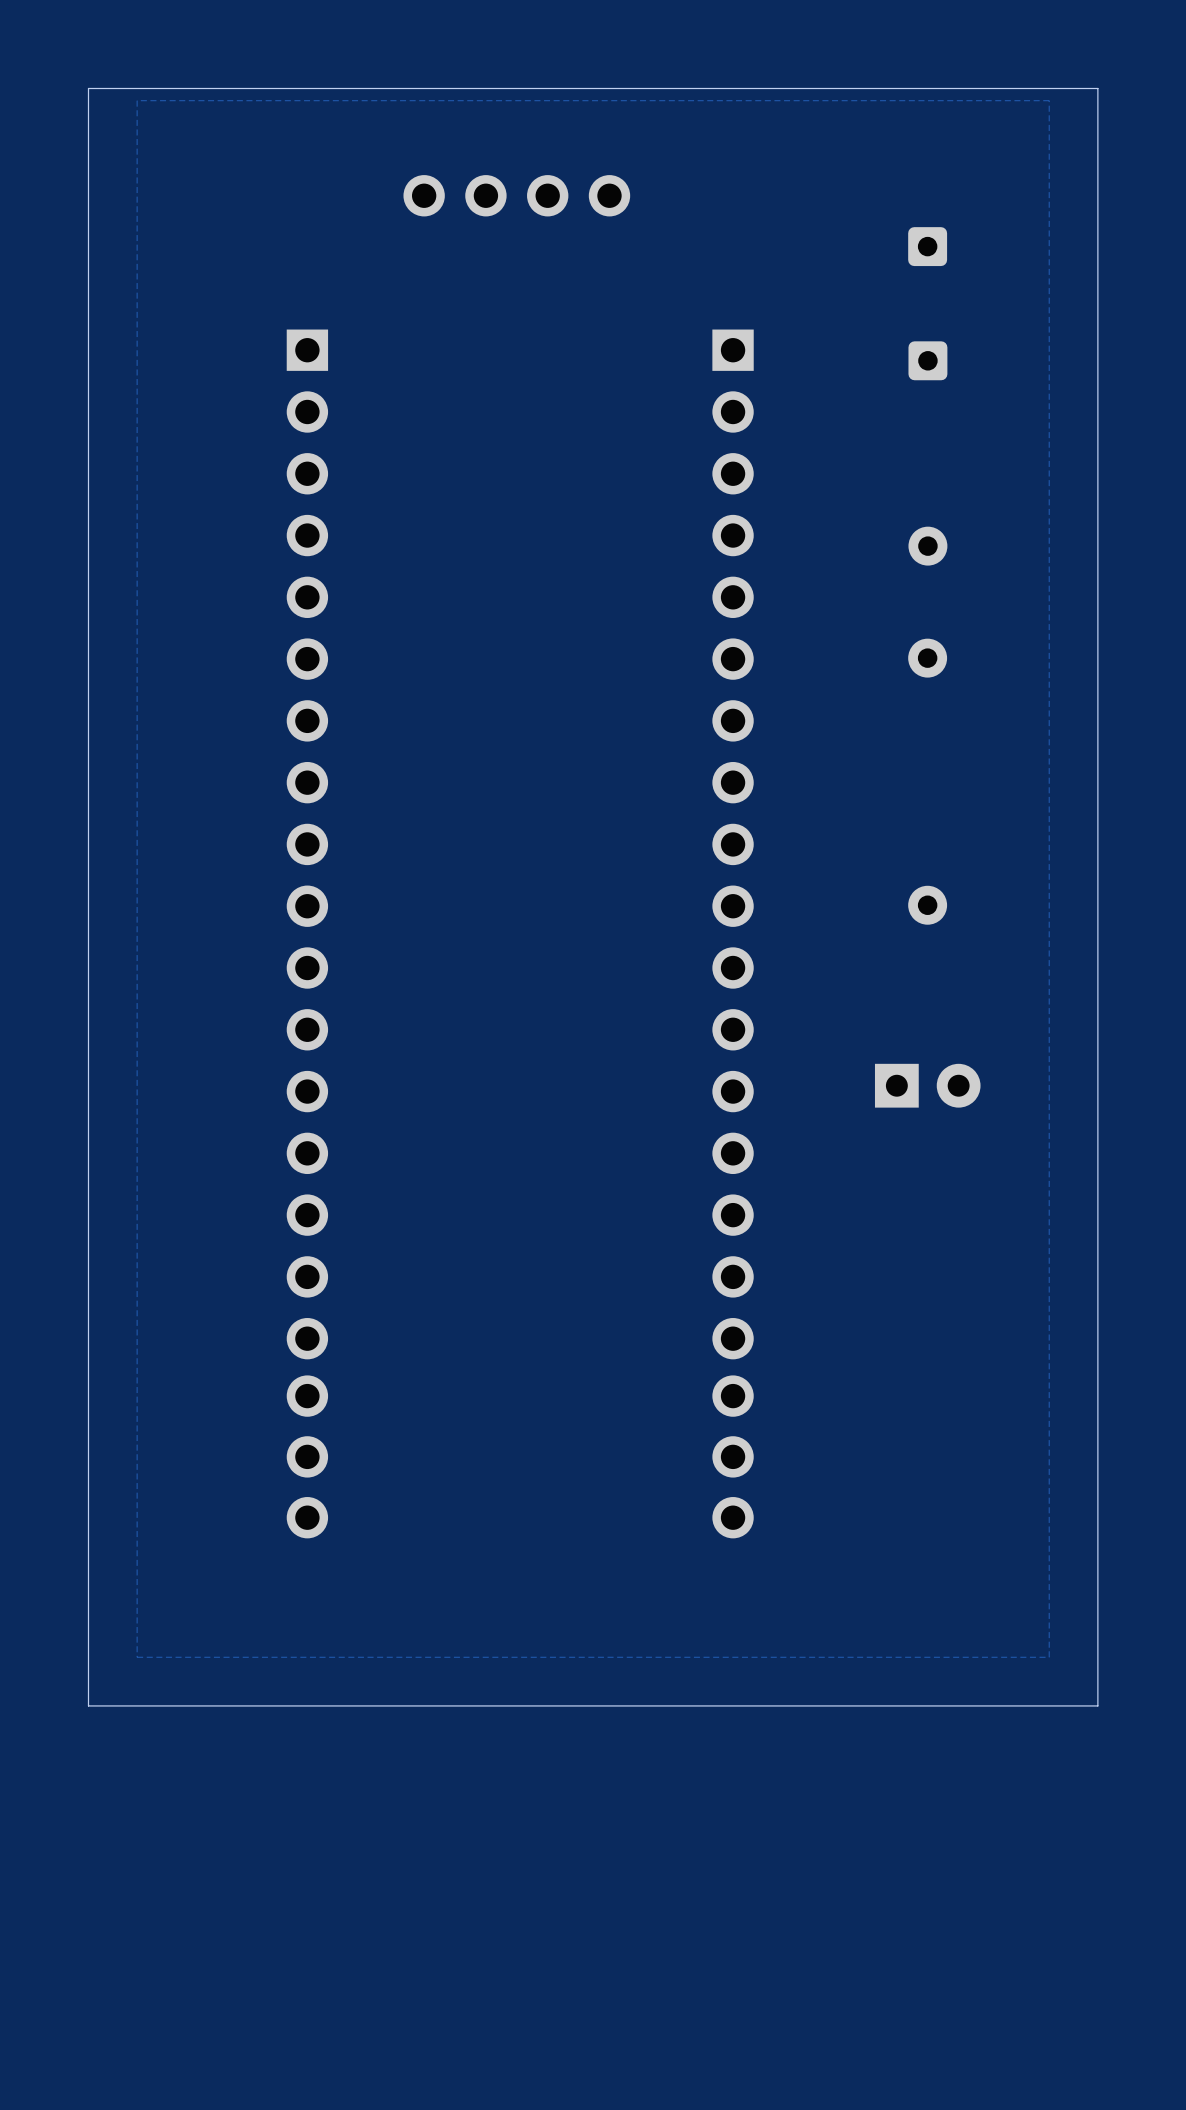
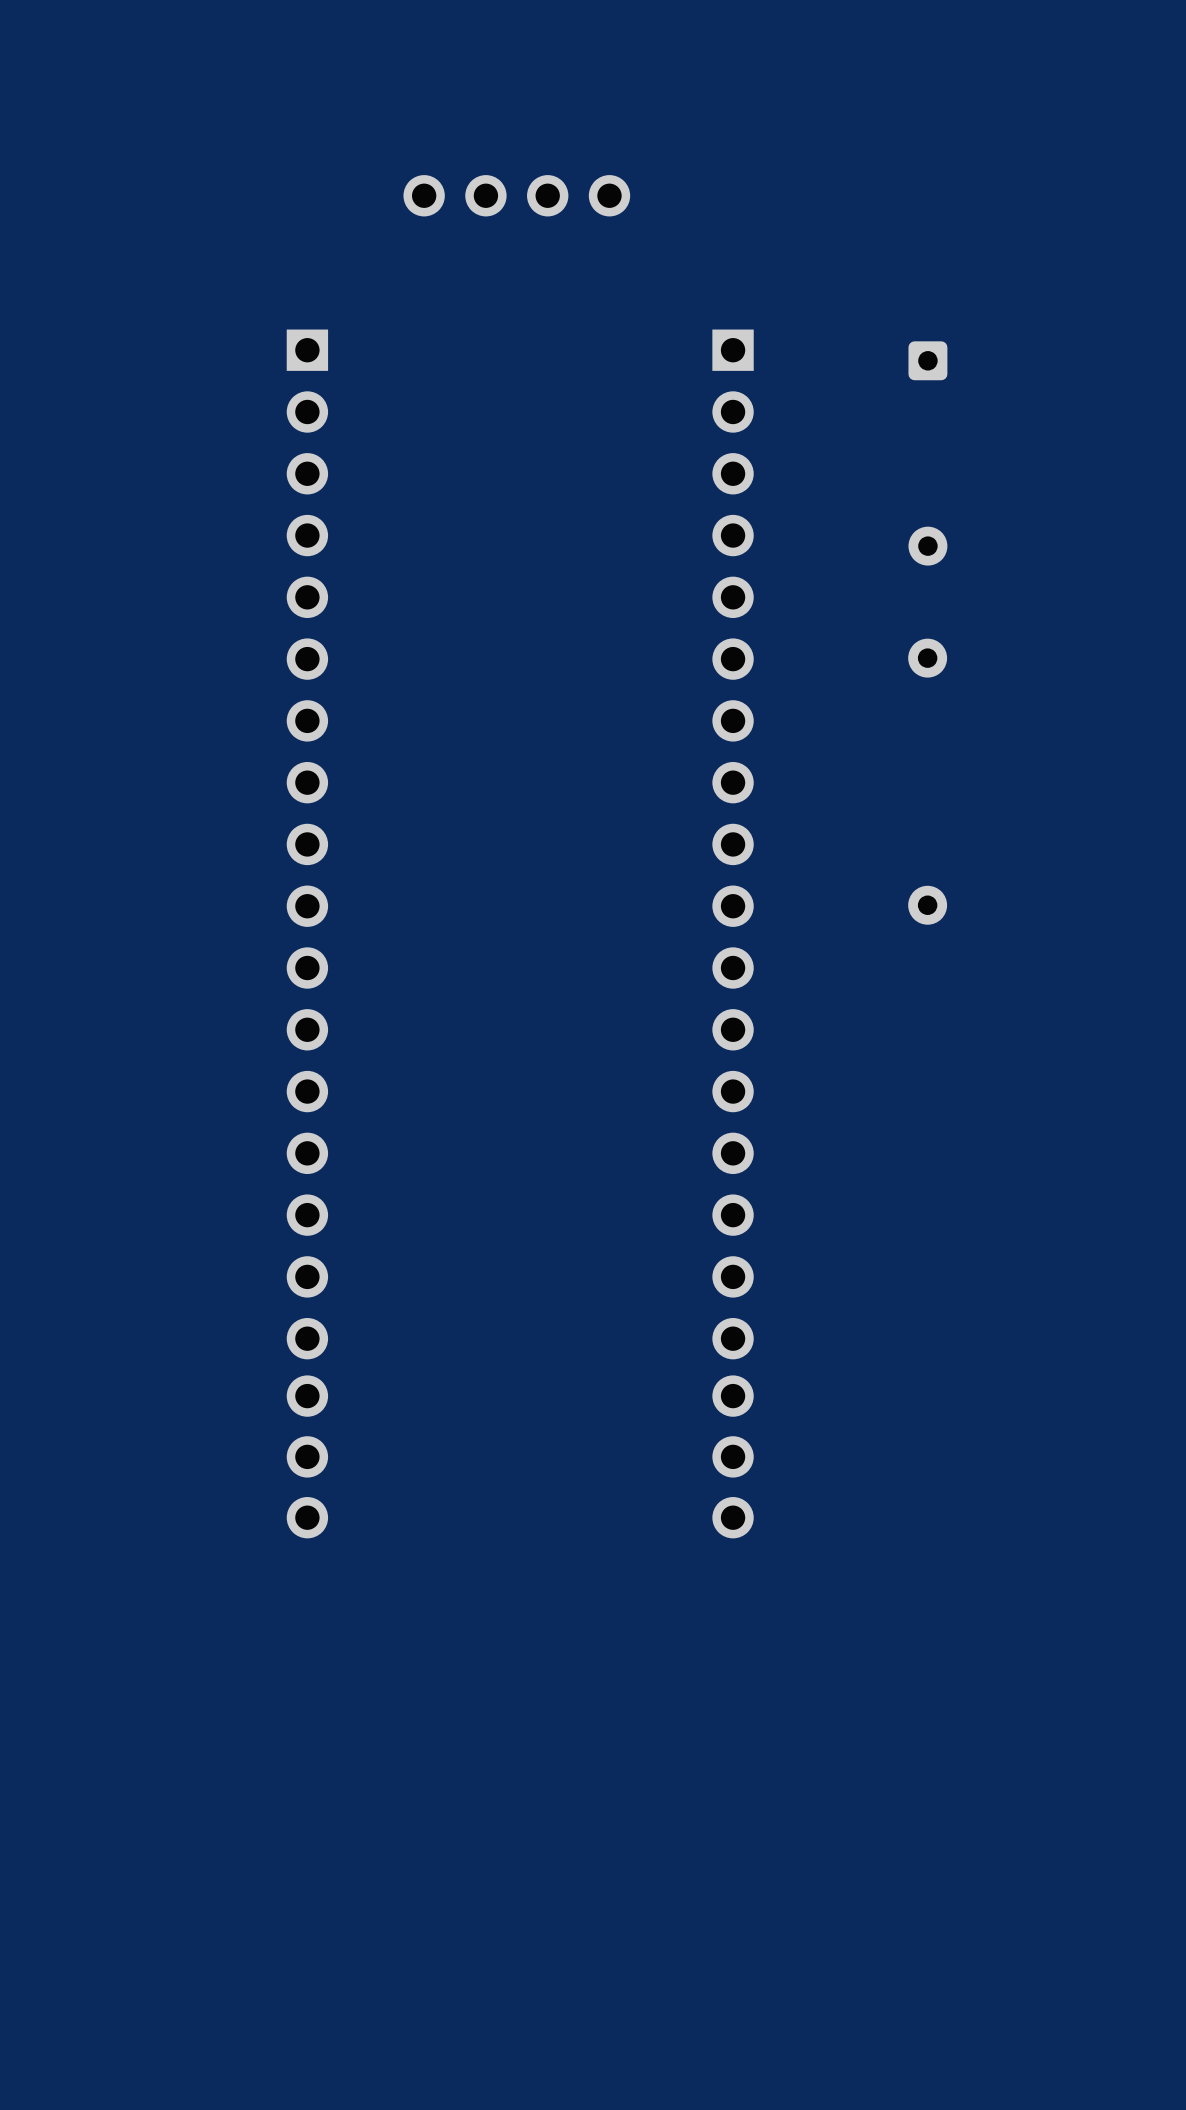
board edge: (1097, 88) (1097, 1705) (88, 1705) (88, 88) (1097, 88) -> none
zone outline: (1049, 100) (137, 100) (137, 1657) (1049, 1657) (1049, 100) -> none
part: (927, 246) -> none
part: (927, 1085) -> none

